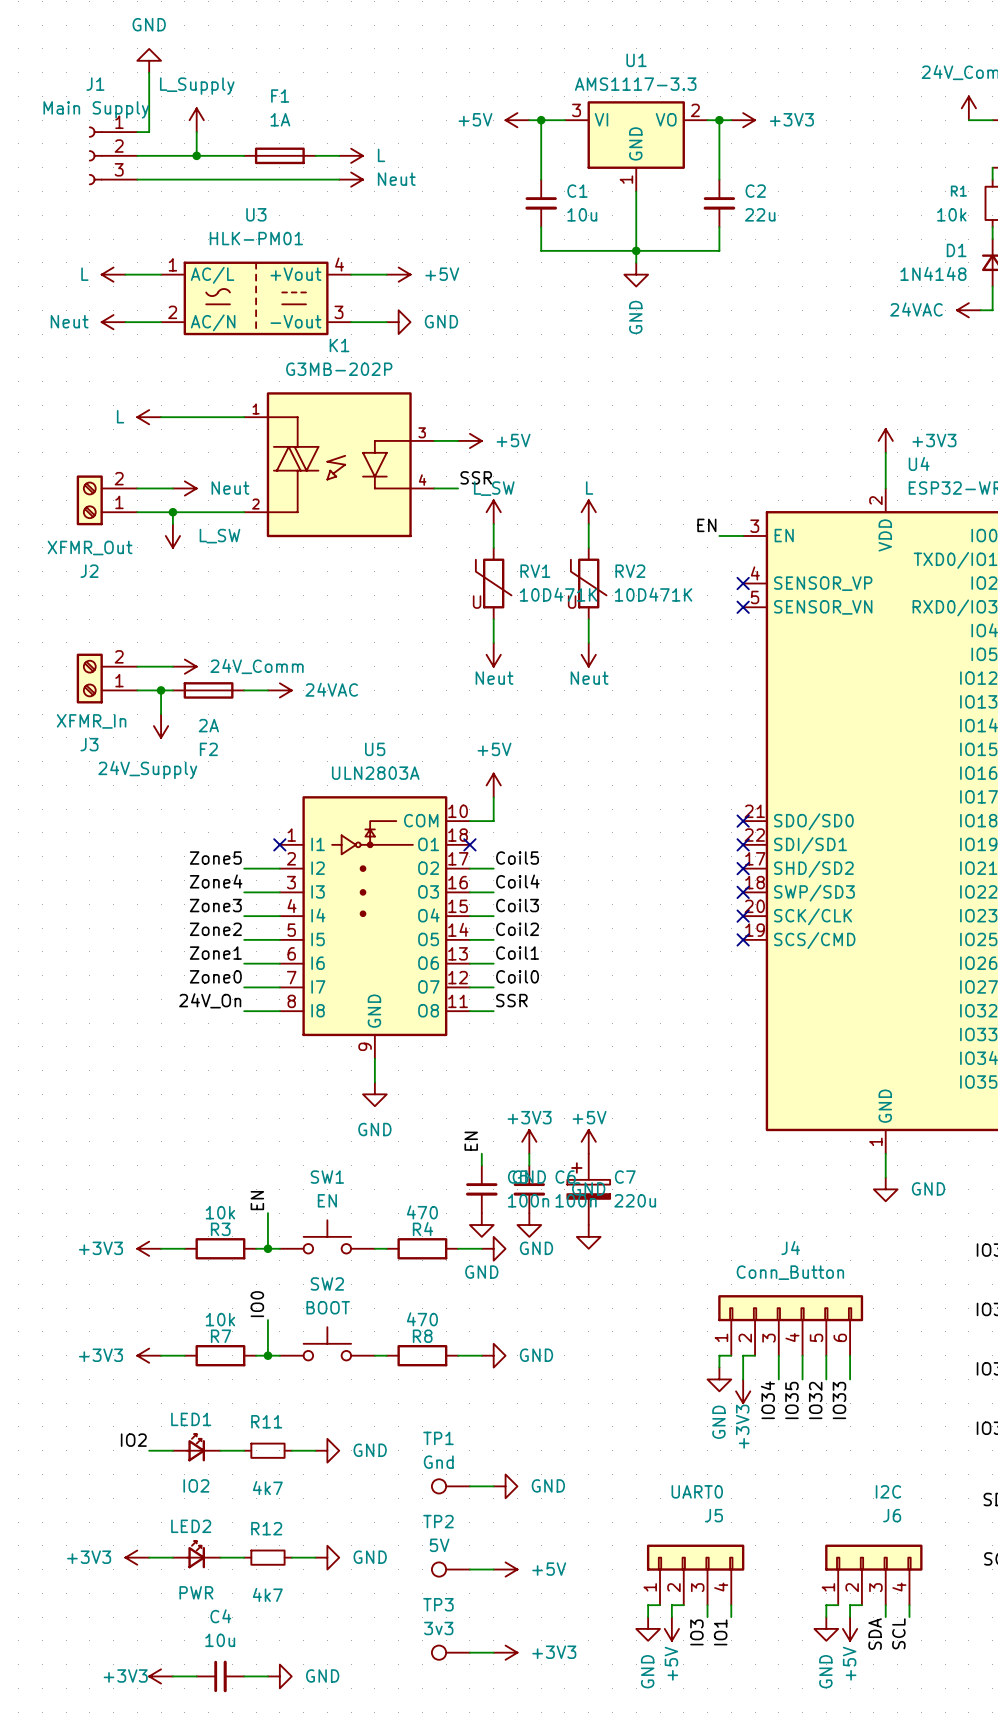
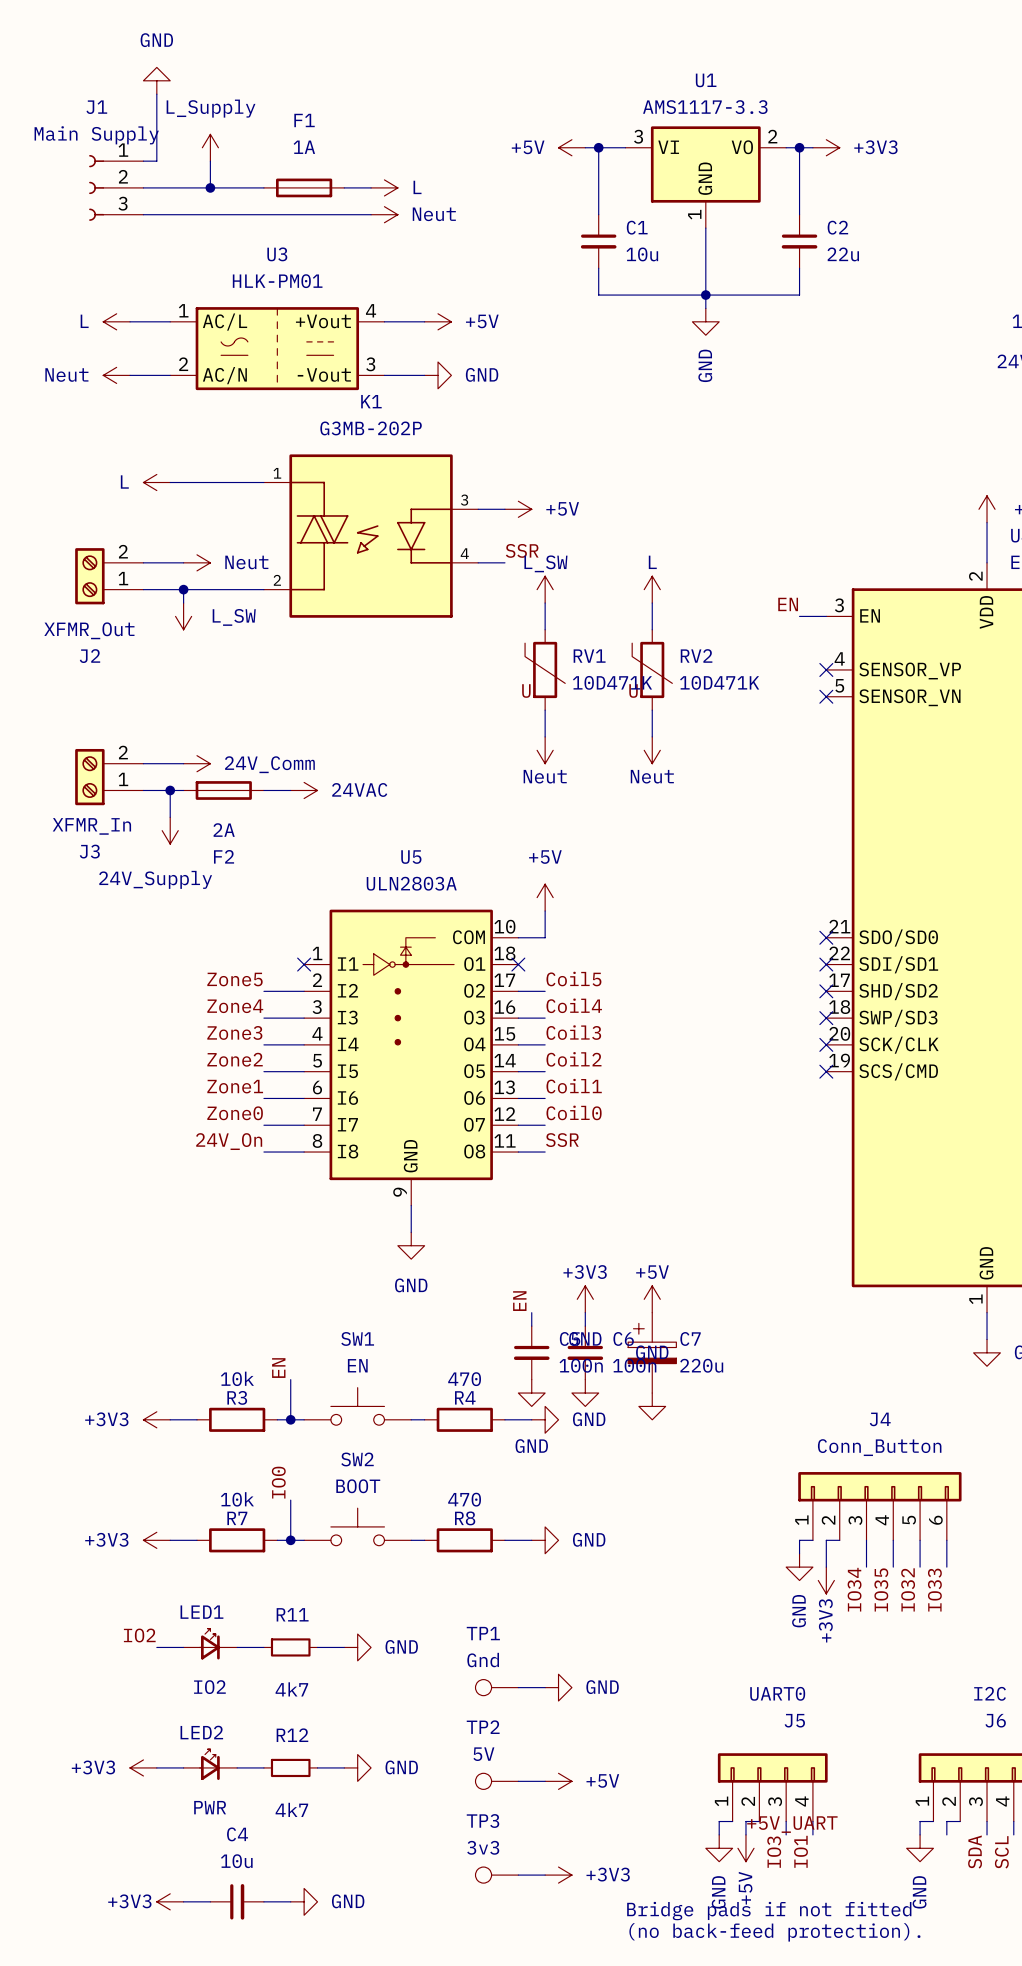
label: none -> +5V_UART (792, 1824)
power symbol: +5V (850, 1628) -> none
text: none -> Bridge pads if not fitted (769, 1911)
text: none -> (no back-feed protection). (774, 1932)

